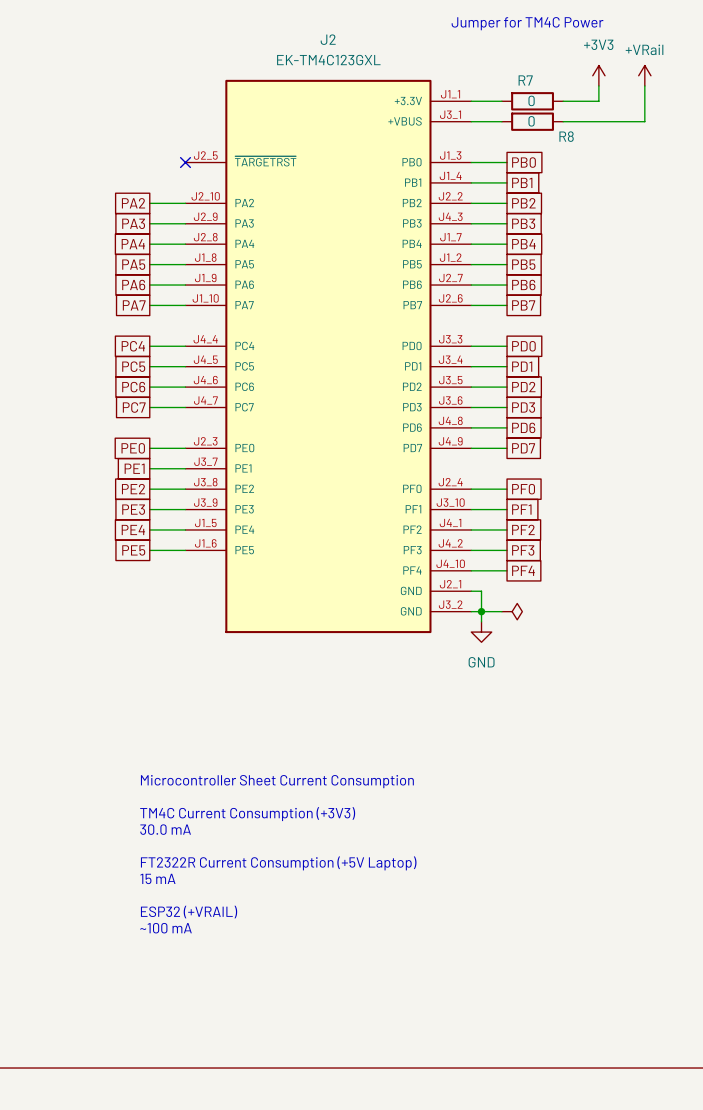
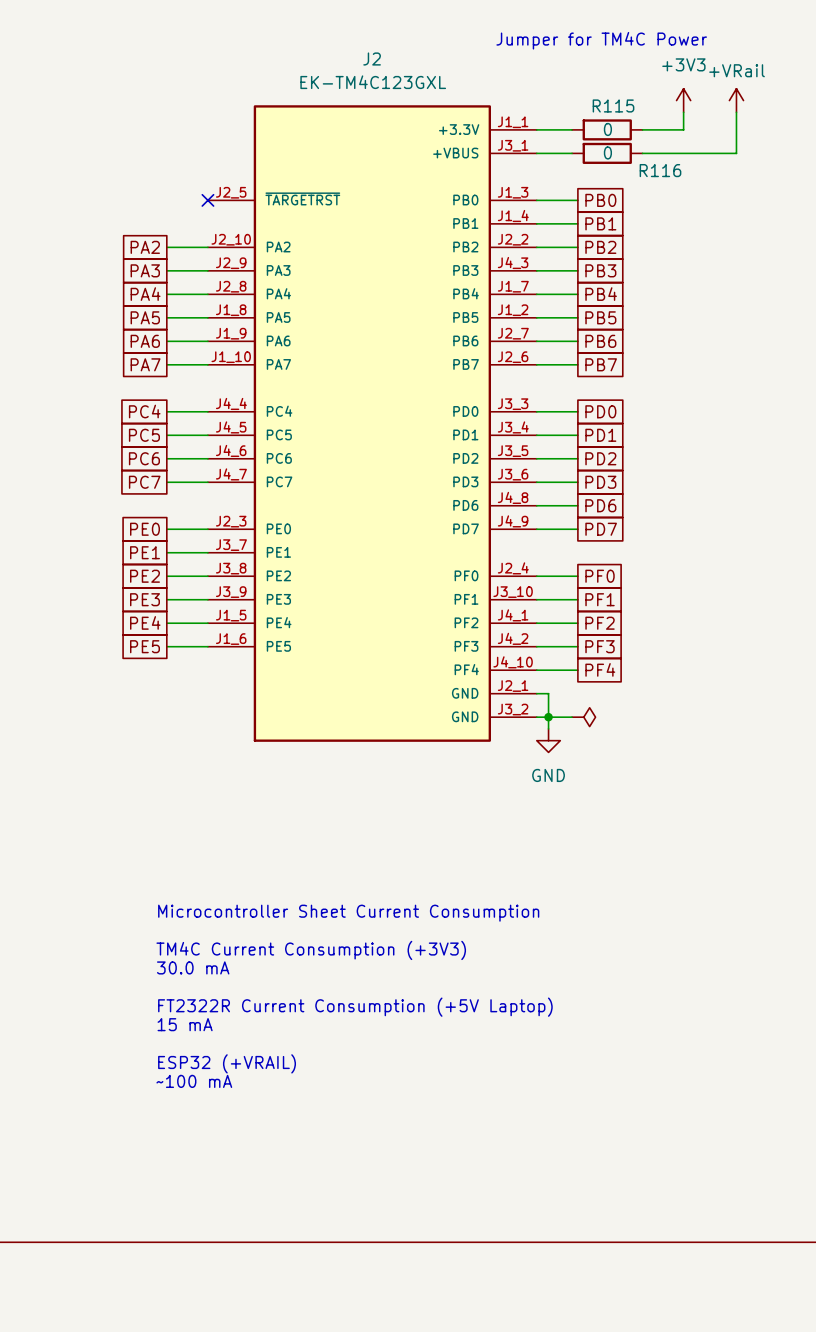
R7 name: R7 (525, 80) -> R115 (613, 105)
R8 name: R8 (566, 136) -> R116 (660, 170)

